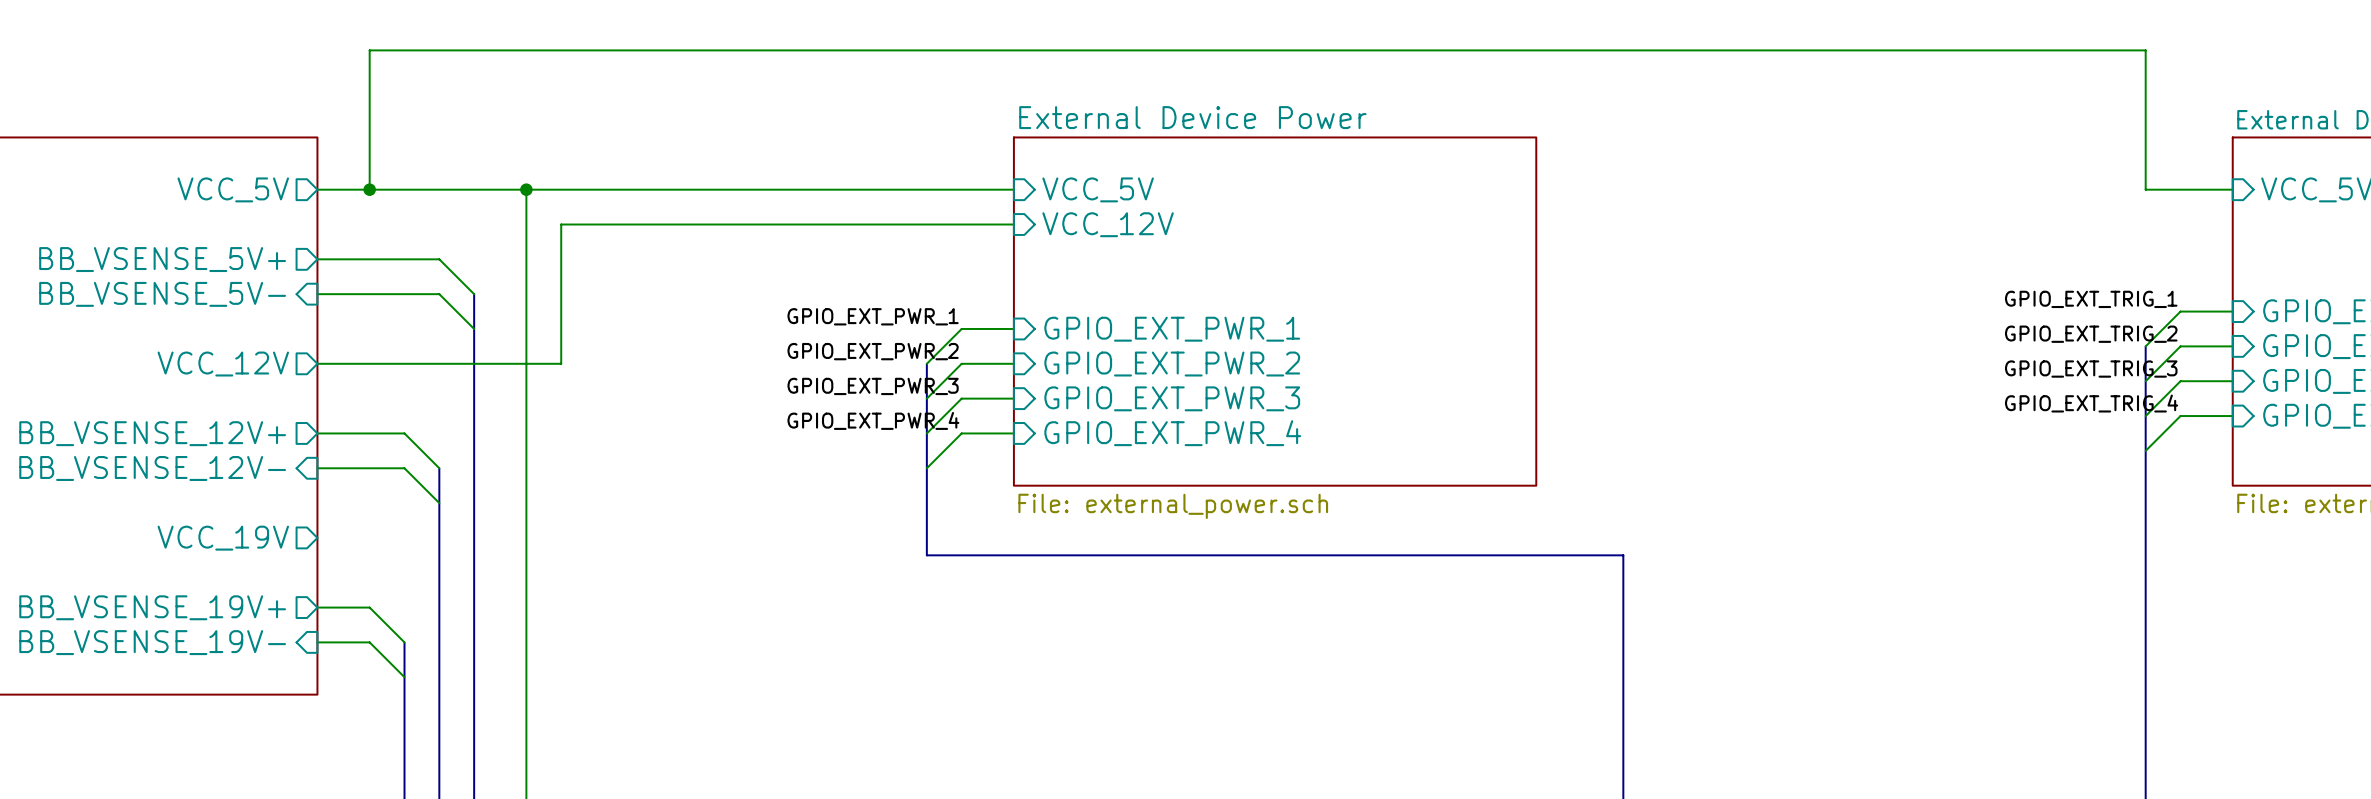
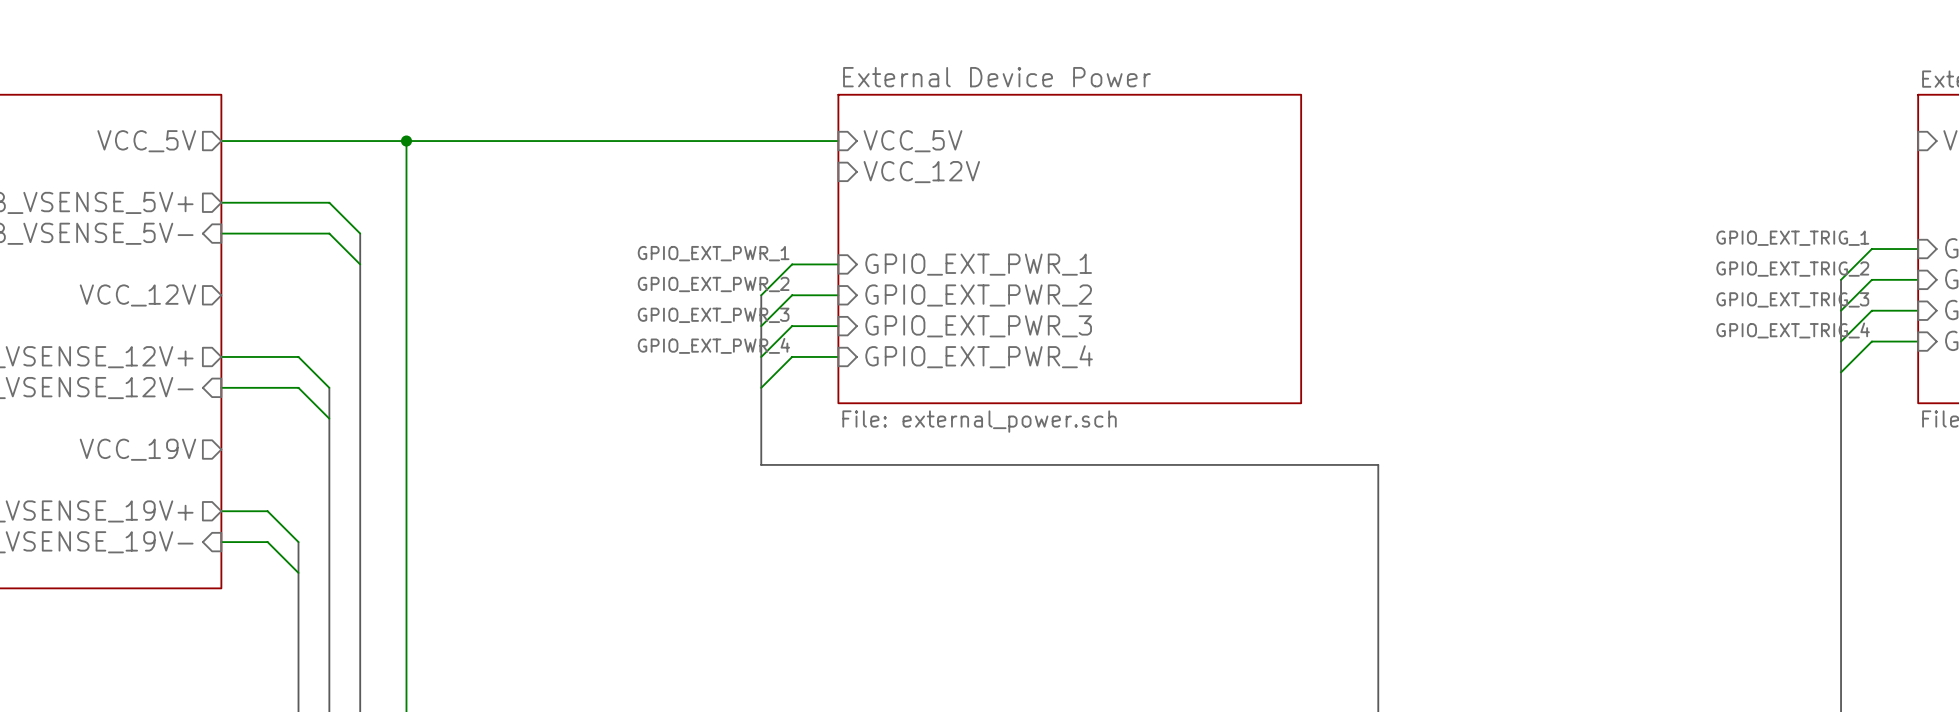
wire: (369, 189) (369, 50) (2145, 50) (2145, 189) (2232, 189) -> none
junction: (369, 189) -> none
wire: (1013, 224) (561, 224) (561, 363) (317, 363) -> none

